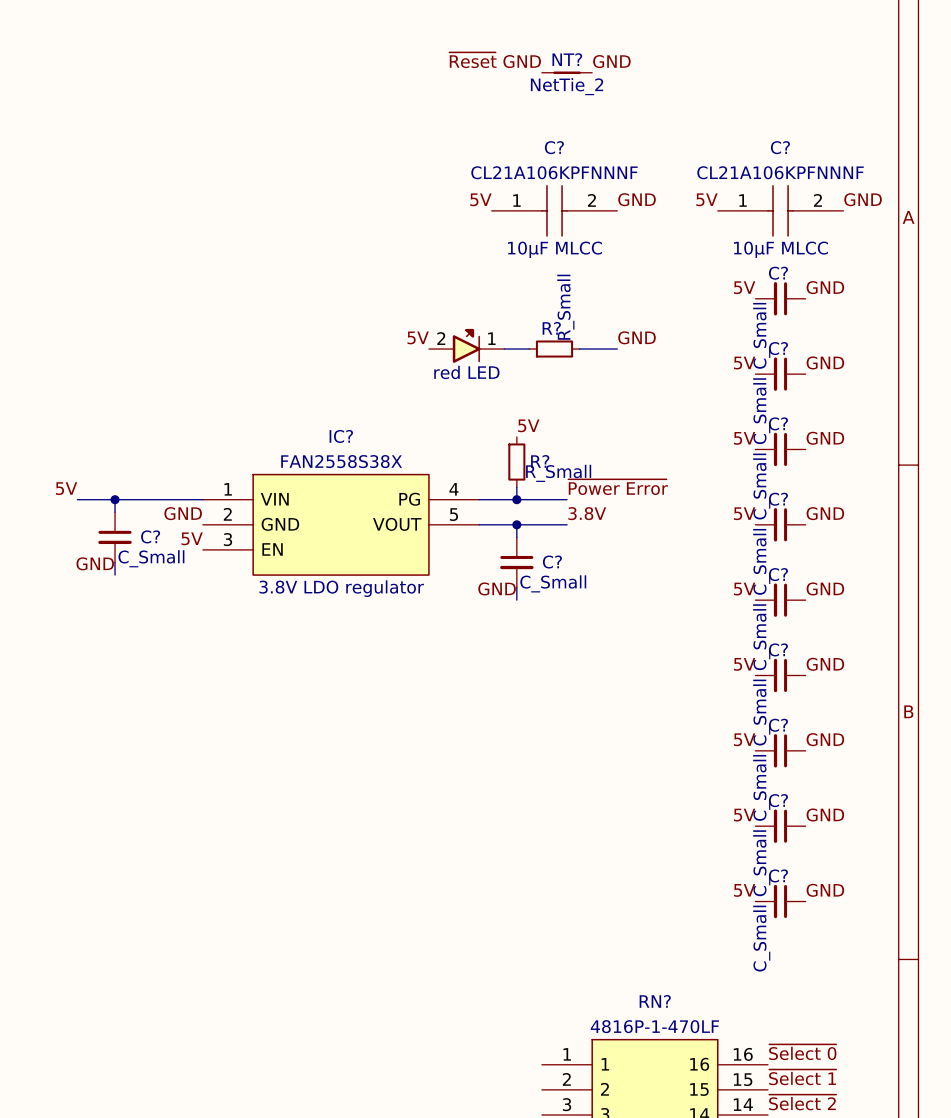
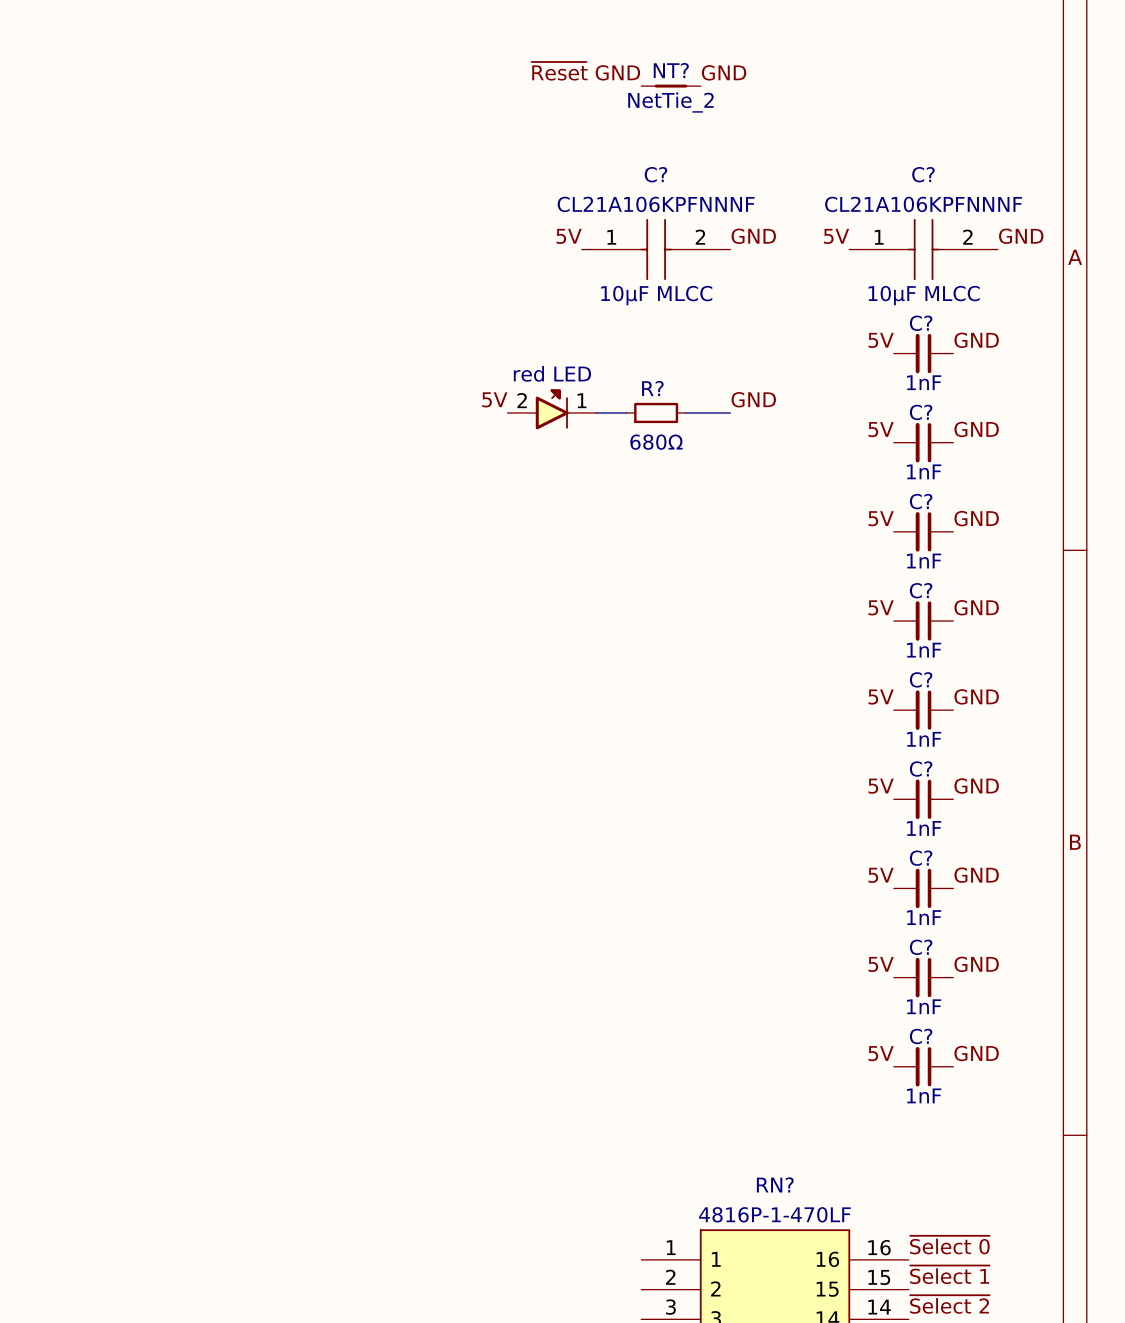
R? value: R_Small (565, 307) -> none
C? text: none -> 1nF (924, 382)
C? value: C_Small (761, 335) -> none
part text position: red LED (466, 372) -> red LED (552, 373)
R? text: none -> 680Ω (656, 442)
C? text: none -> 1nF (924, 471)
C? value: C_Small (761, 411) -> none
label: 5V (528, 425) -> none
R?: R_Small (516, 462) -> none
C? text: none -> 1nF (924, 561)
C? value: C_Small (761, 486) -> none
wire: (516, 487) (516, 499) -> none
label: ~{Power Error} (618, 487) -> none
label: 5V (66, 488) -> none
wire: (77, 499) (202, 499) -> none
wire: (115, 499) (115, 512) -> none
junction: (115, 499) -> none
wire: (479, 499) (567, 499) -> none
junction: (516, 499) -> none
label: GND (183, 513) -> none
label: 3.8V (587, 513) -> none
IC?: FAN2558S38X (341, 524) -> none
wire: (479, 524) (567, 524) -> none
wire: (516, 524) (516, 537) -> none
junction: (516, 524) -> none
C?: C_Small (115, 537) -> none
label: 5V (192, 538) -> none
C? text: none -> 1nF (924, 650)
C? value: C_Small (761, 561) -> none
wire: (115, 562) (115, 575) -> none
C?: C_Small (516, 562) -> none
label: GND (95, 563) -> none
wire: (516, 587) (516, 600) -> none
label: GND (497, 588) -> none
C? text: none -> 1nF (924, 739)
C? value: C_Small (761, 637) -> none
C? text: none -> 1nF (924, 828)
C? value: C_Small (761, 712) -> none
C? text: none -> 1nF (924, 917)
C? value: C_Small (761, 787) -> none
C? text: none -> 1nF (924, 1006)
C? value: C_Small (761, 863) -> none
C? text: none -> 1nF (924, 1095)
C? value: C_Small (761, 938) -> none

